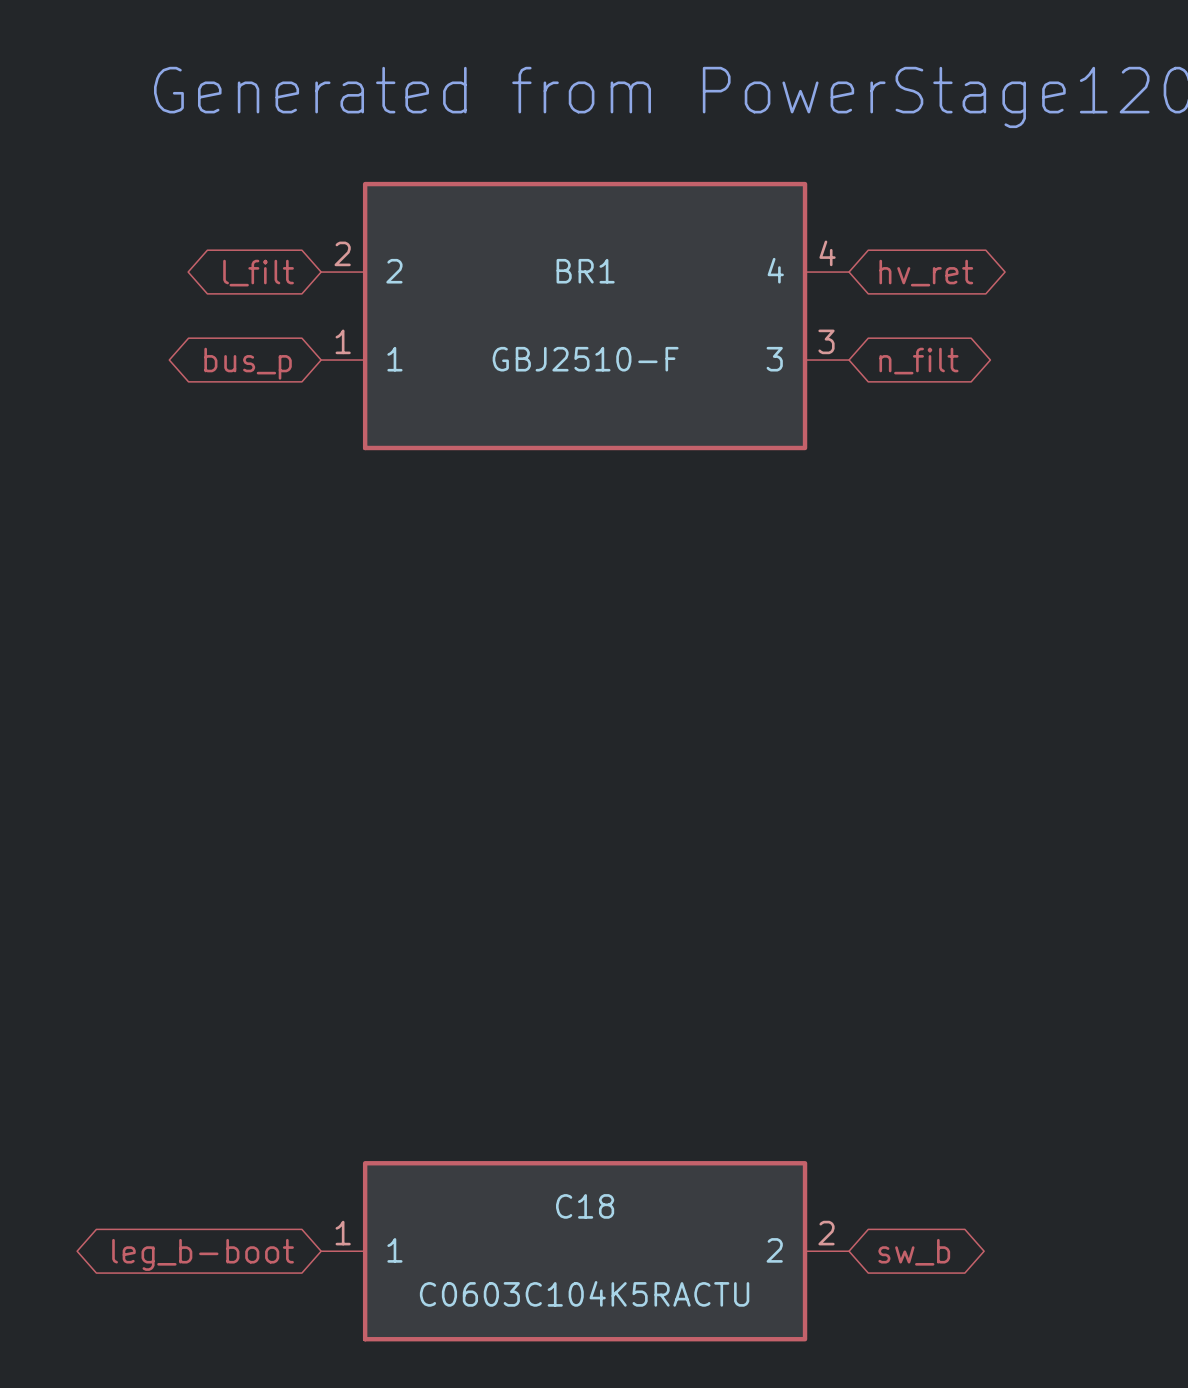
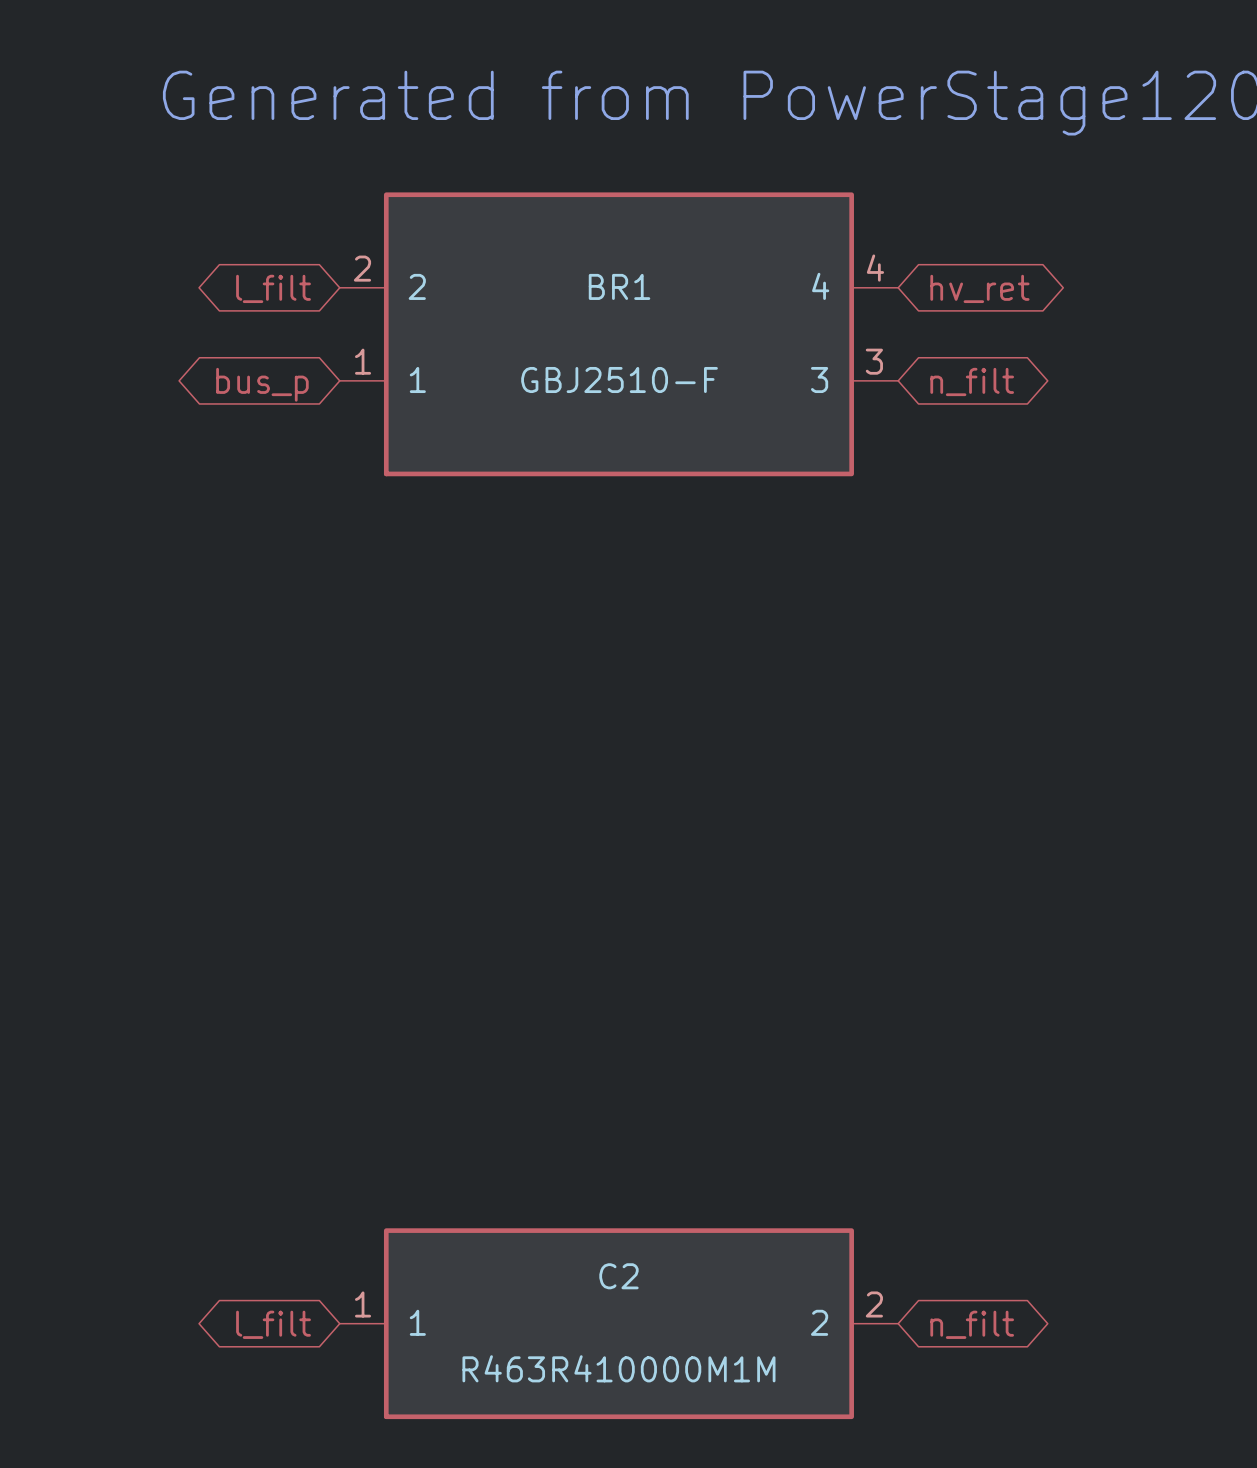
C18 name: C18 (585, 1206) -> C2 (618, 1276)
global label: sw_b (914, 1252) -> n_filt (972, 1324)
global label: leg_b-boot (203, 1254) -> l_filt (273, 1324)
C18 value: C0603C104K5RACTU (584, 1293) -> R463R410000M1M (618, 1368)

